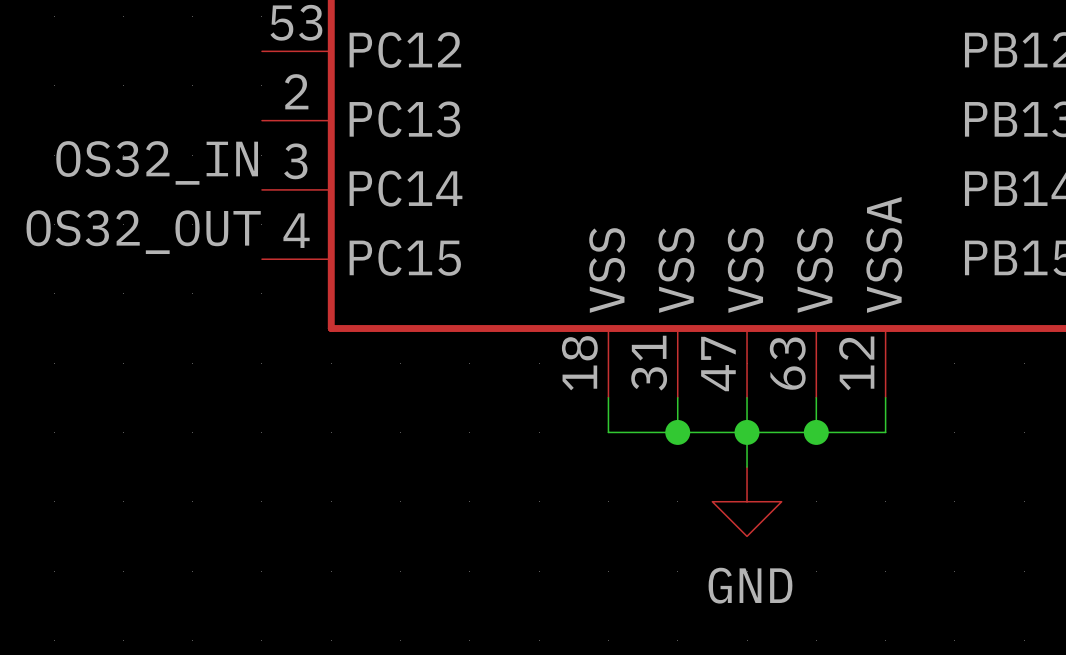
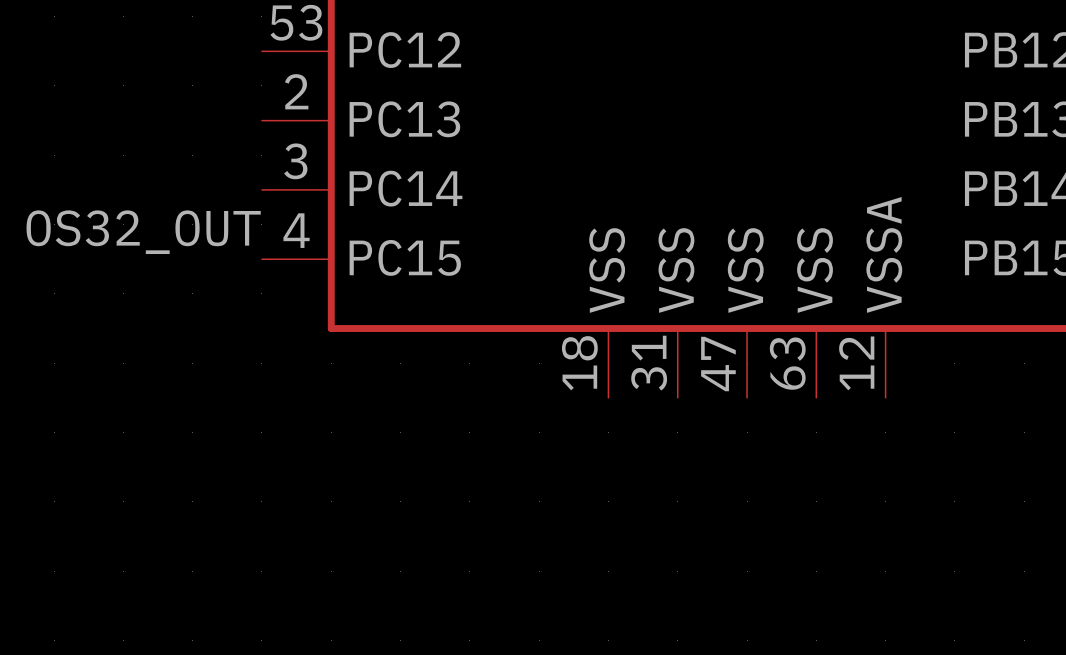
label: OS32_IN (157, 162) -> none
wire: (608, 397) (608, 432) (885, 432) (885, 397) -> none
wire: (677, 397) (677, 432) -> none
wire: (747, 397) (747, 467) -> none
wire: (816, 397) (816, 432) -> none
junction: (677, 432) -> none
junction: (747, 432) -> none
junction: (816, 432) -> none
power symbol: GND (747, 501) -> none

